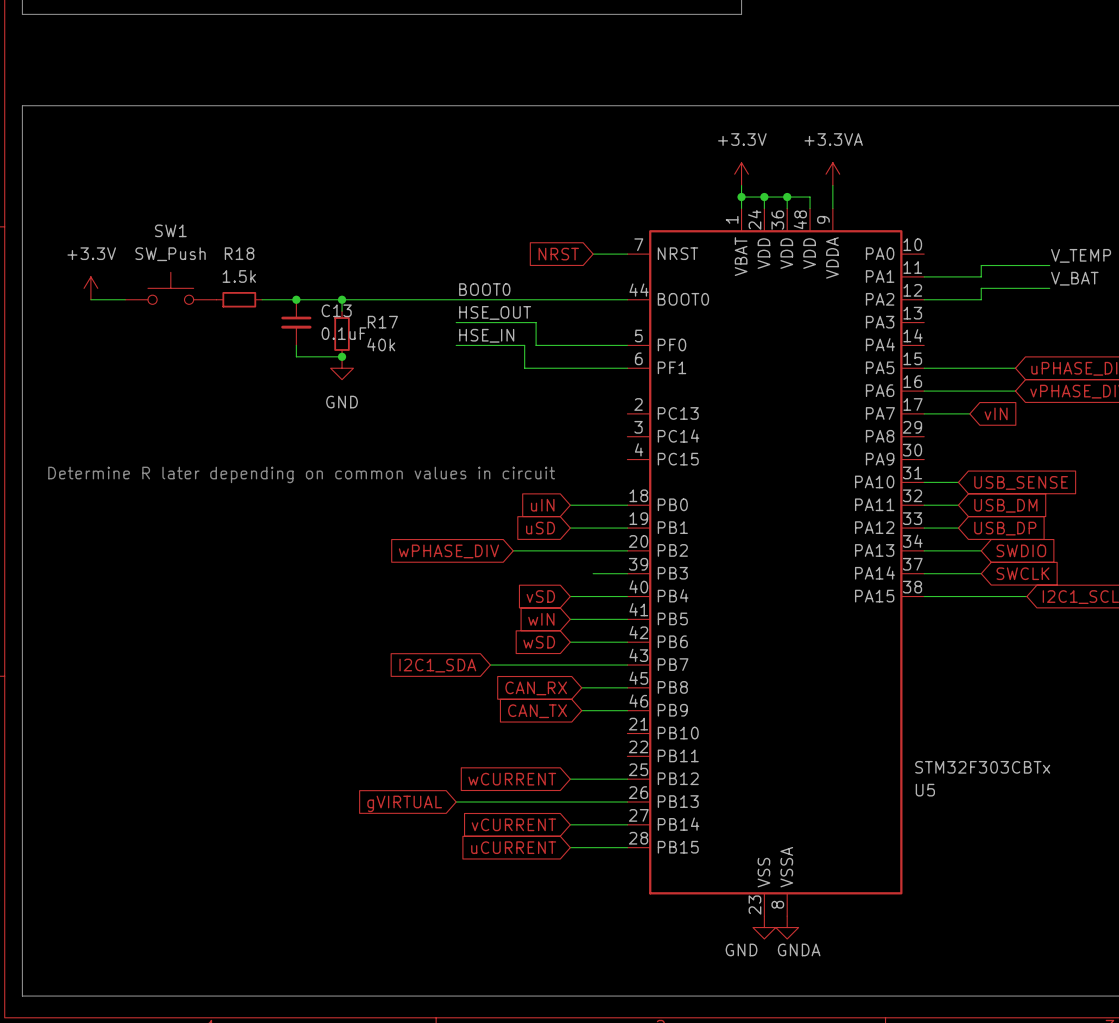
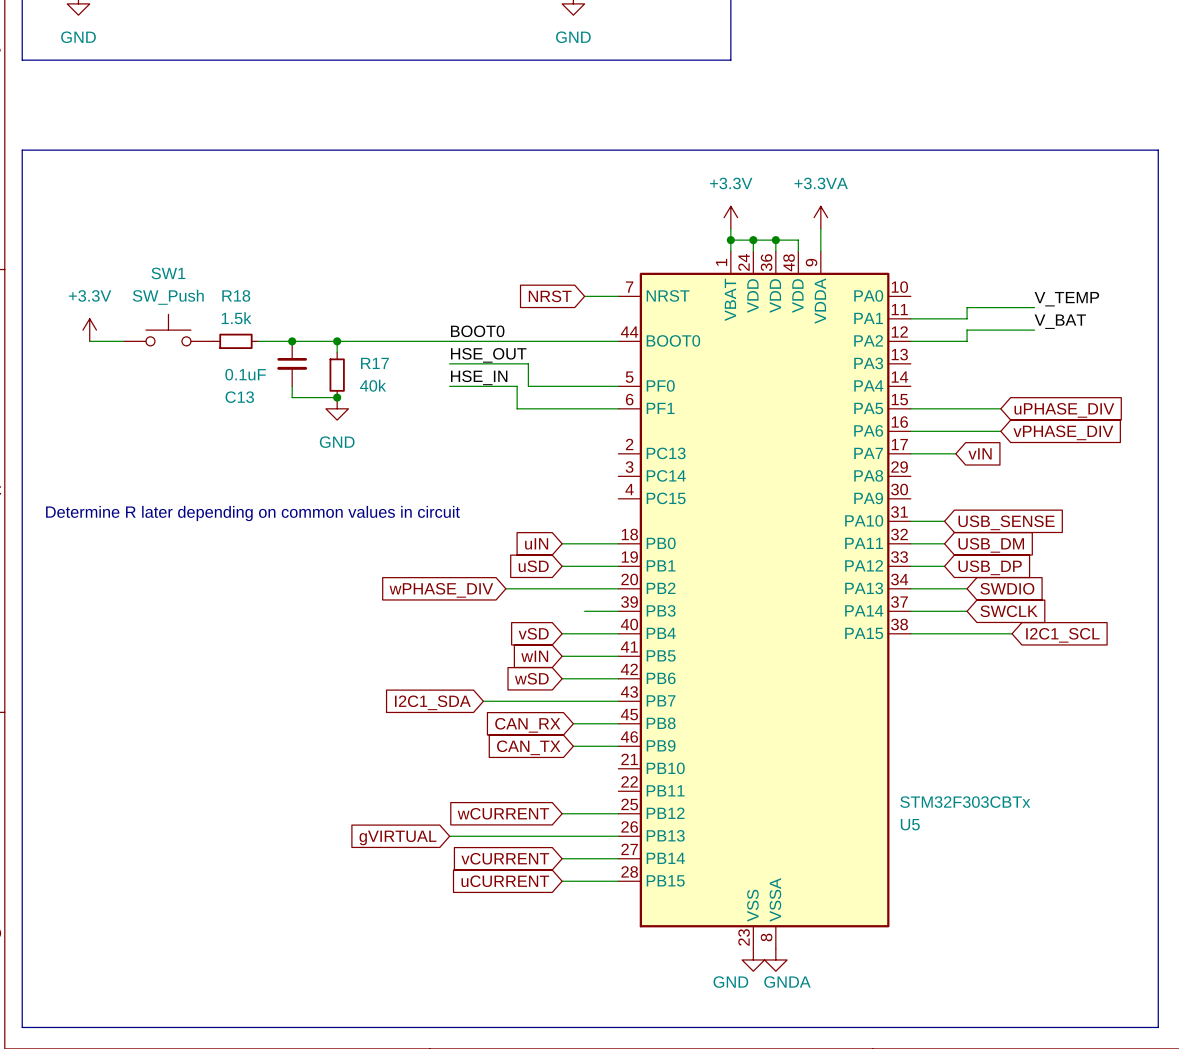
C13 name position: C13 (336, 310) -> C13 (239, 397)
C13 value position: 0.1uF (344, 333) -> 0.1uF (245, 374)

